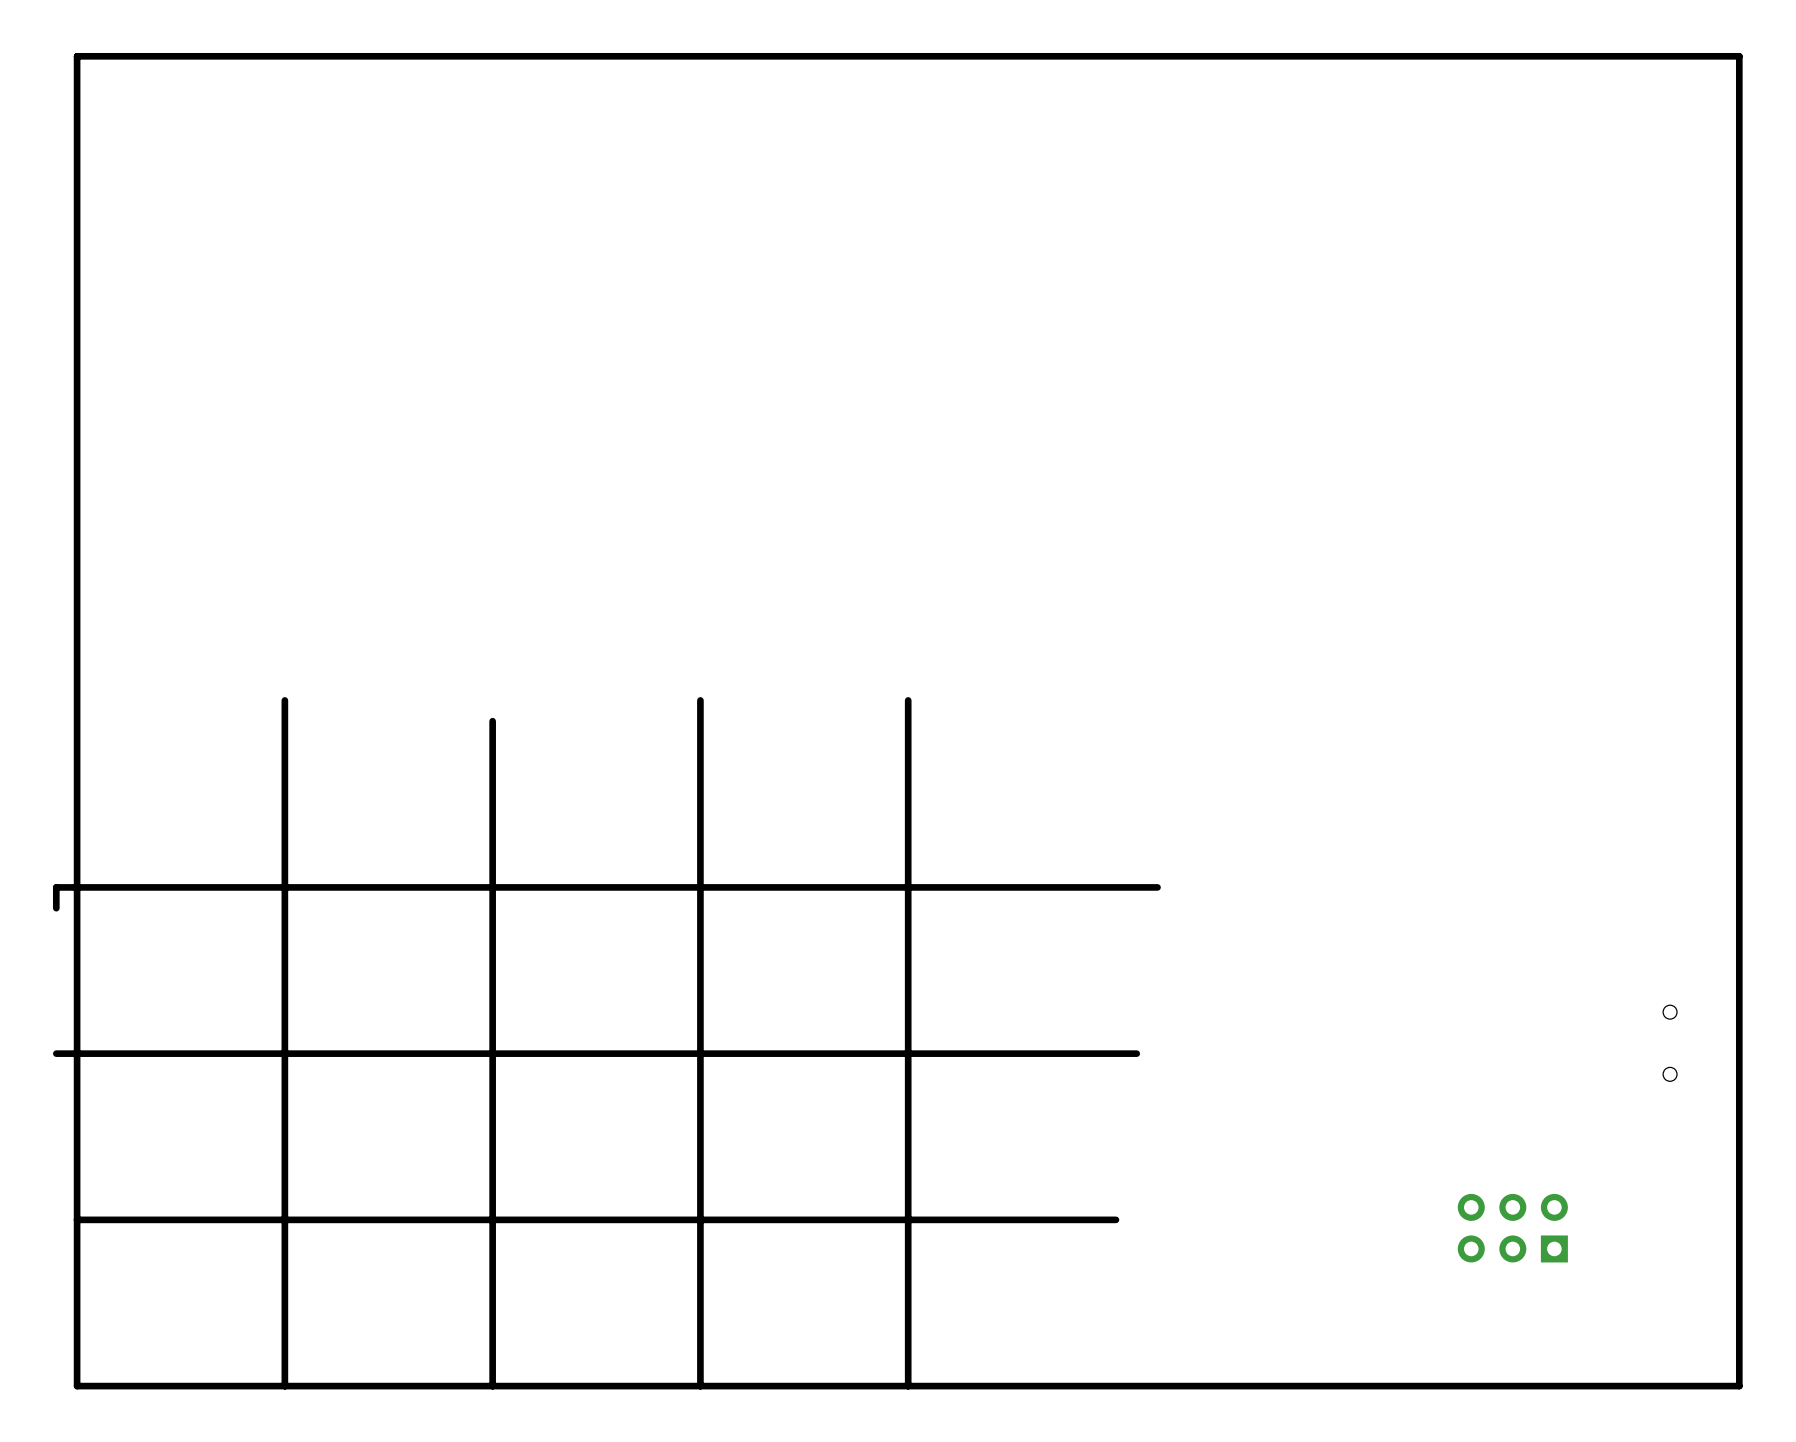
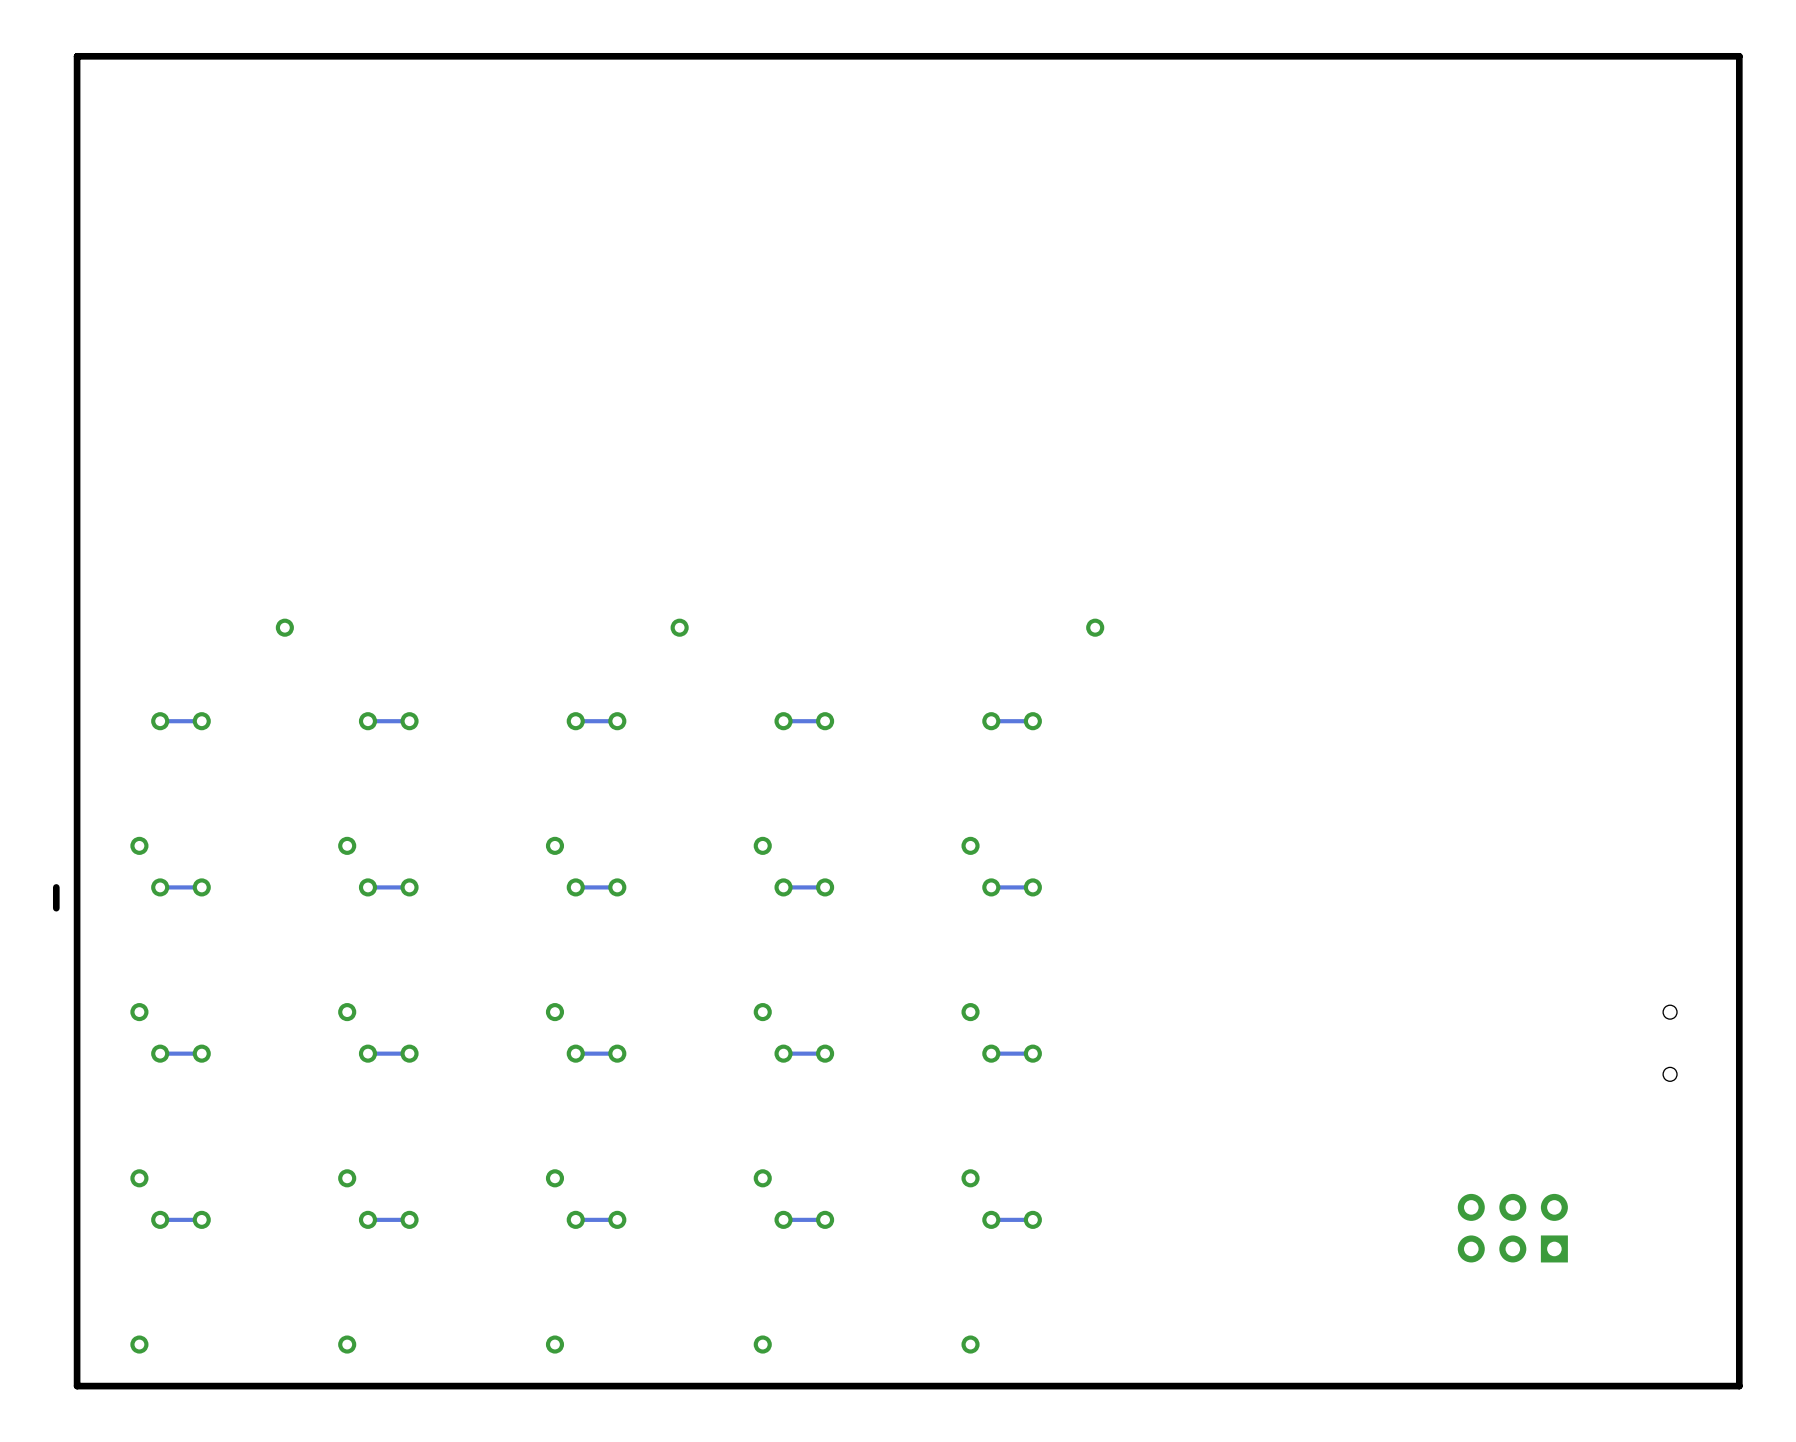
via: none -> (284, 627)
via: none -> (679, 627)
via: none -> (1095, 627)
board edge: (284, 700) (284, 1386) -> none
board edge: (700, 700) (700, 1386) -> none
board edge: (908, 700) (908, 1386) -> none
via: none -> (160, 721)
track: none -> (201, 721) (160, 721)
via: none -> (201, 721)
via: none -> (367, 721)
track: none -> (409, 721) (367, 721)
via: none -> (409, 721)
board edge: (492, 721) (492, 1386) -> none
via: none -> (575, 721)
track: none -> (617, 721) (575, 721)
via: none -> (617, 721)
via: none -> (783, 721)
track: none -> (825, 721) (783, 721)
via: none -> (825, 721)
via: none -> (991, 721)
track: none -> (1032, 721) (991, 721)
via: none -> (1032, 721)
via: none -> (139, 845)
via: none -> (347, 845)
via: none -> (554, 845)
via: none -> (762, 845)
via: none -> (970, 845)
via: none -> (160, 887)
track: none -> (201, 887) (160, 887)
via: none -> (201, 887)
via: none -> (367, 887)
track: none -> (409, 887) (367, 887)
via: none -> (409, 887)
via: none -> (575, 887)
track: none -> (617, 887) (575, 887)
via: none -> (617, 887)
via: none -> (783, 887)
track: none -> (825, 887) (783, 887)
via: none -> (825, 887)
via: none -> (991, 887)
track: none -> (1032, 887) (991, 887)
via: none -> (1032, 887)
board edge: (1157, 887) (56, 887) -> none
via: none -> (139, 1012)
via: none -> (347, 1012)
via: none -> (554, 1012)
via: none -> (762, 1012)
via: none -> (970, 1012)
via: none -> (160, 1053)
track: none -> (201, 1053) (160, 1053)
via: none -> (201, 1053)
via: none -> (367, 1053)
track: none -> (409, 1053) (367, 1053)
via: none -> (409, 1053)
via: none -> (575, 1053)
track: none -> (617, 1053) (575, 1053)
via: none -> (617, 1053)
via: none -> (783, 1053)
track: none -> (825, 1053) (783, 1053)
via: none -> (825, 1053)
via: none -> (991, 1053)
track: none -> (1032, 1053) (991, 1053)
via: none -> (1032, 1053)
board edge: (1136, 1053) (56, 1053) -> none
via: none -> (139, 1178)
via: none -> (347, 1178)
via: none -> (554, 1178)
via: none -> (762, 1178)
via: none -> (970, 1178)
via: none -> (160, 1219)
track: none -> (201, 1219) (160, 1219)
via: none -> (201, 1219)
via: none -> (367, 1219)
track: none -> (409, 1219) (367, 1219)
via: none -> (409, 1219)
via: none -> (575, 1219)
track: none -> (617, 1219) (575, 1219)
via: none -> (617, 1219)
via: none -> (783, 1219)
track: none -> (825, 1219) (783, 1219)
via: none -> (825, 1219)
via: none -> (991, 1219)
track: none -> (1032, 1219) (991, 1219)
via: none -> (1032, 1219)
board edge: (1115, 1219) (77, 1219) -> none
via: none -> (139, 1344)
via: none -> (347, 1344)
via: none -> (554, 1344)
via: none -> (762, 1344)
via: none -> (970, 1344)

